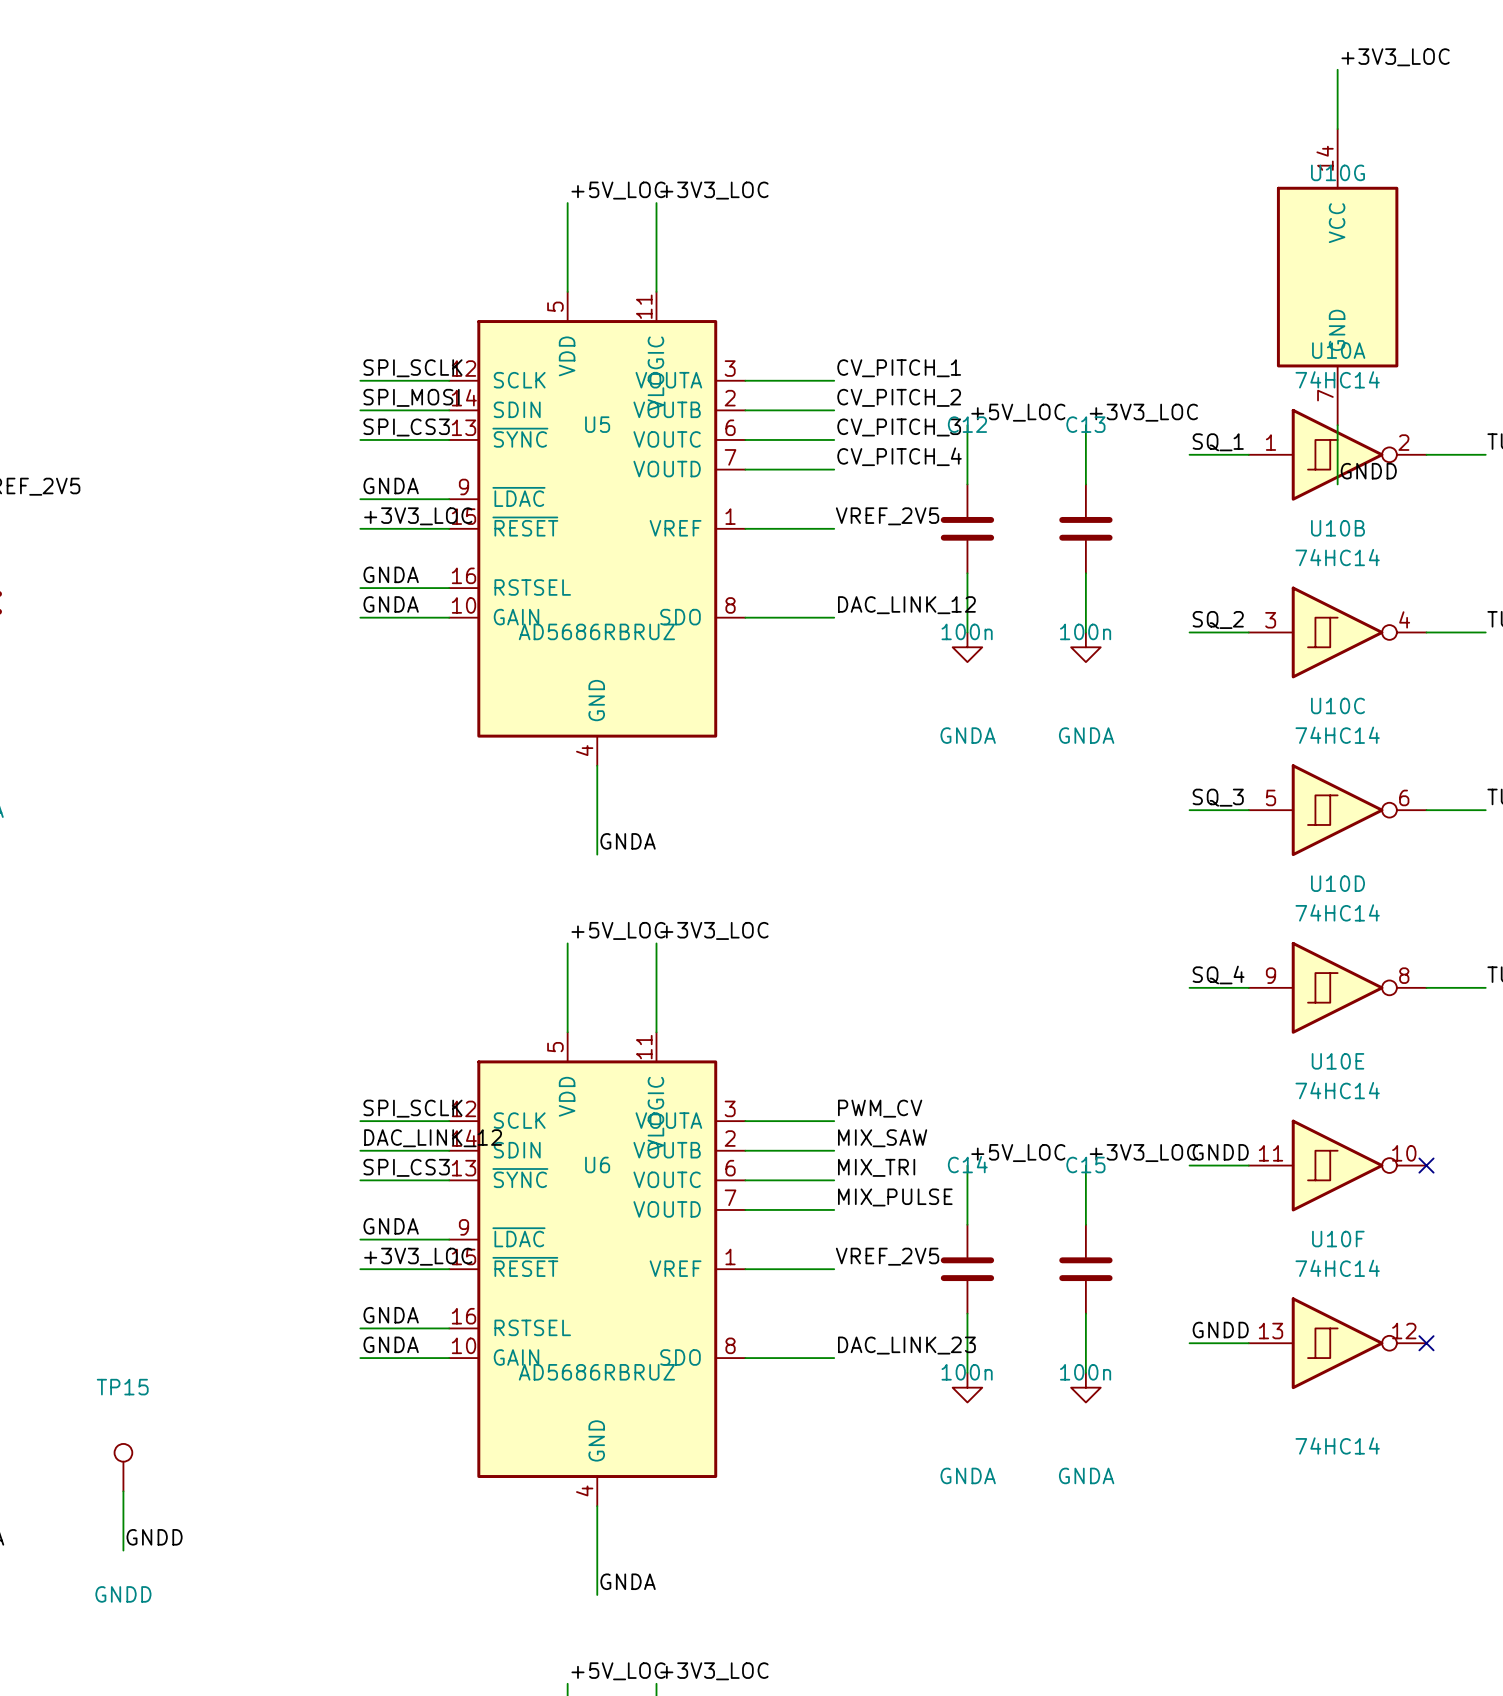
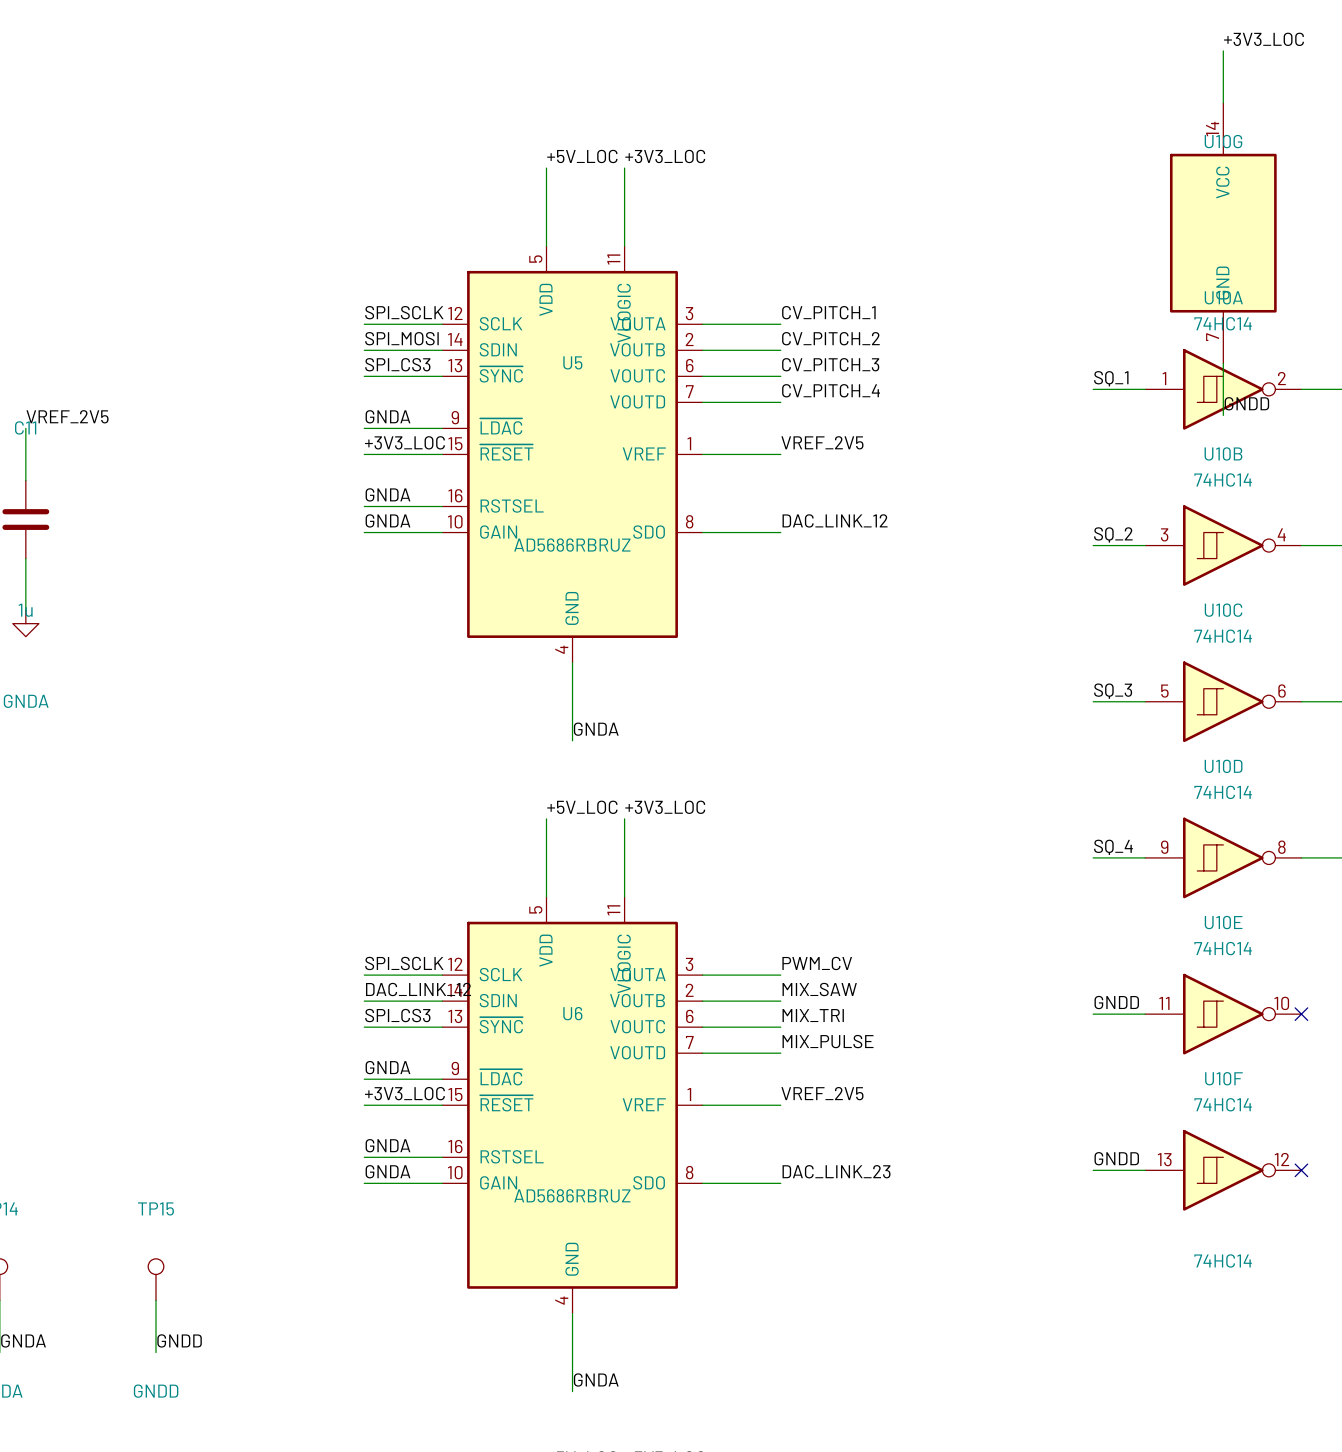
label: +5V_LOC (1018, 412) -> none
label: +3V3_LOC (1143, 412) -> none
wire: (967, 425) (967, 484) -> none
wire: (1085, 425) (1085, 484) -> none
C12: 100n (967, 528) -> none
C13: 100n (1085, 528) -> none
wire: (967, 573) (967, 632) -> none
wire: (1085, 573) (1085, 632) -> none
power symbol: GNDA (967, 647) -> none
power symbol: GNDA (1085, 647) -> none
label: +5V_LOC (1018, 1153) -> none
label: +3V3_LOC (1143, 1153) -> none
wire: (967, 1165) (967, 1224) -> none
wire: (1085, 1165) (1085, 1224) -> none
C14: 100n (967, 1269) -> none
C15: 100n (1085, 1269) -> none
wire: (967, 1313) (967, 1372) -> none
wire: (1085, 1313) (1085, 1372) -> none
power symbol: GNDA (967, 1387) -> none
power symbol: GNDA (1085, 1387) -> none

